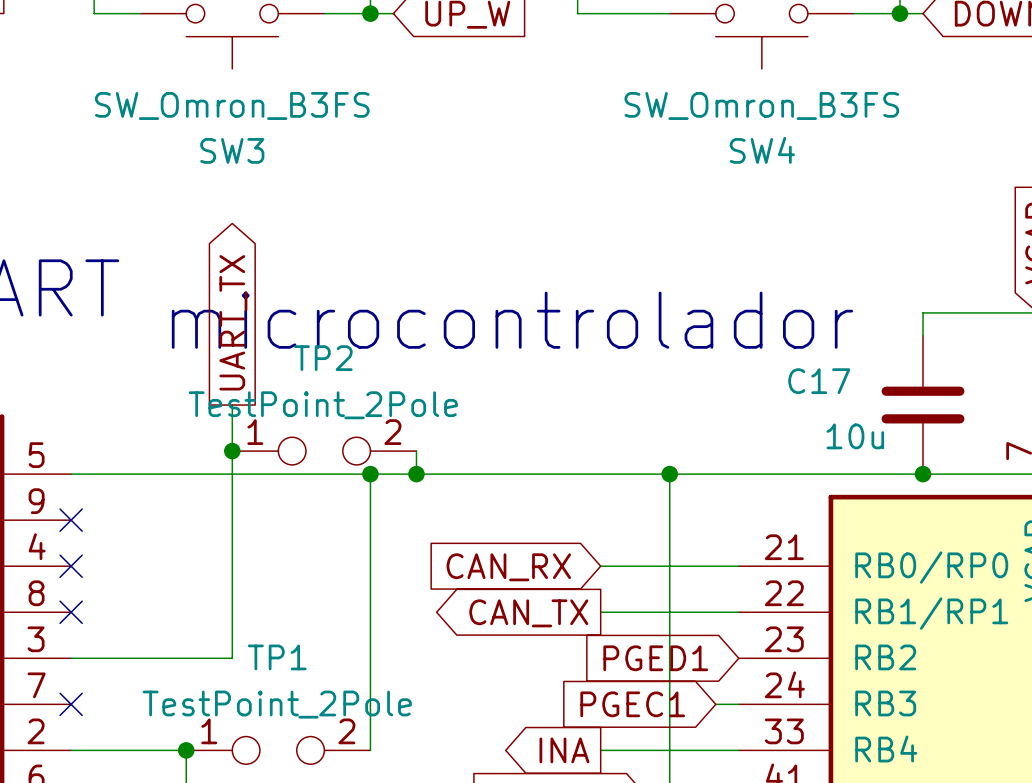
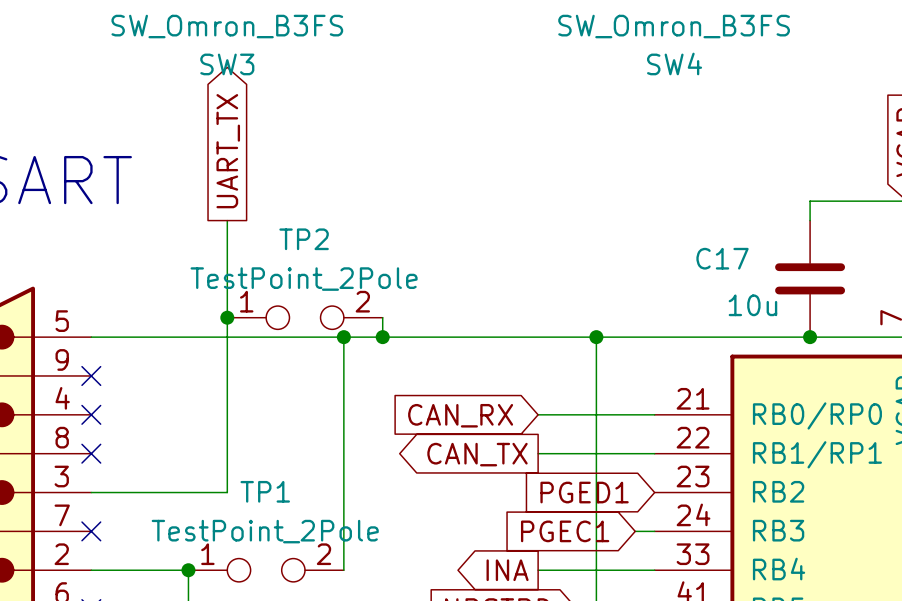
text: microcontrolador (512, 320) -> none
global label position: UART_TX (233, 322) -> UART_TX (228, 151)
wire: none -> (227, 220) (227, 278)

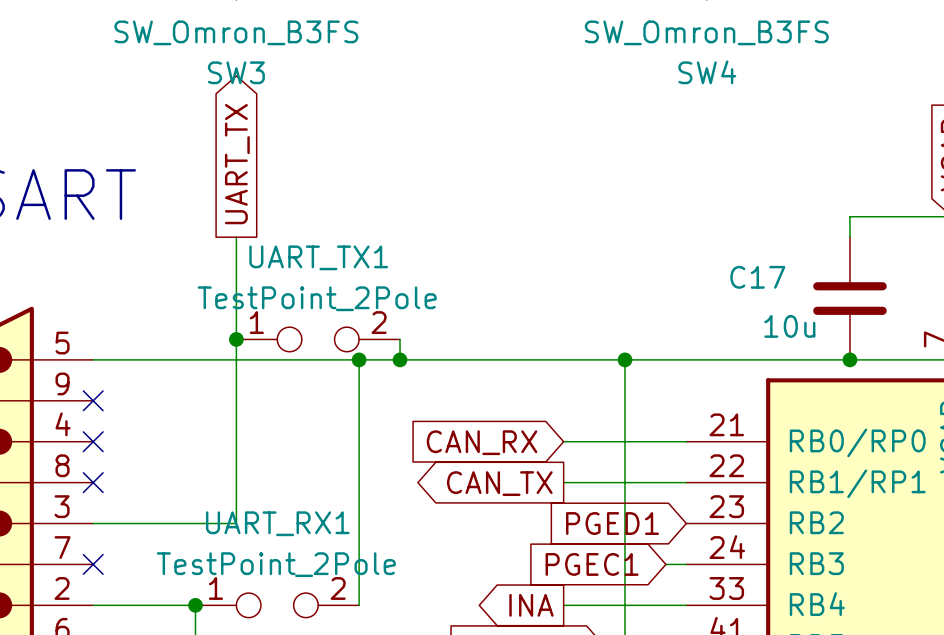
TP2 name: TP2 (304, 239) -> UART_TX1 (318, 257)
TP1 name: TP1 (265, 491) -> UART_RX1 (277, 523)

